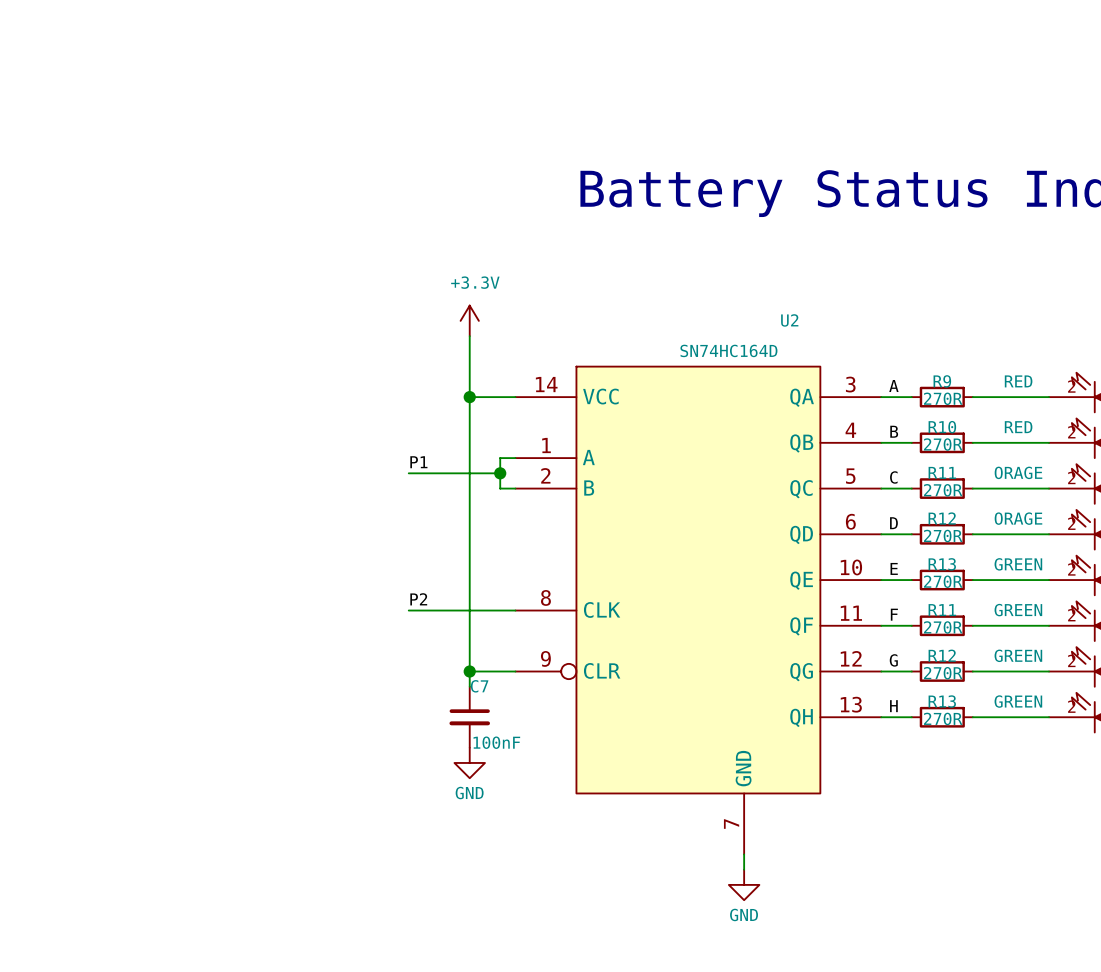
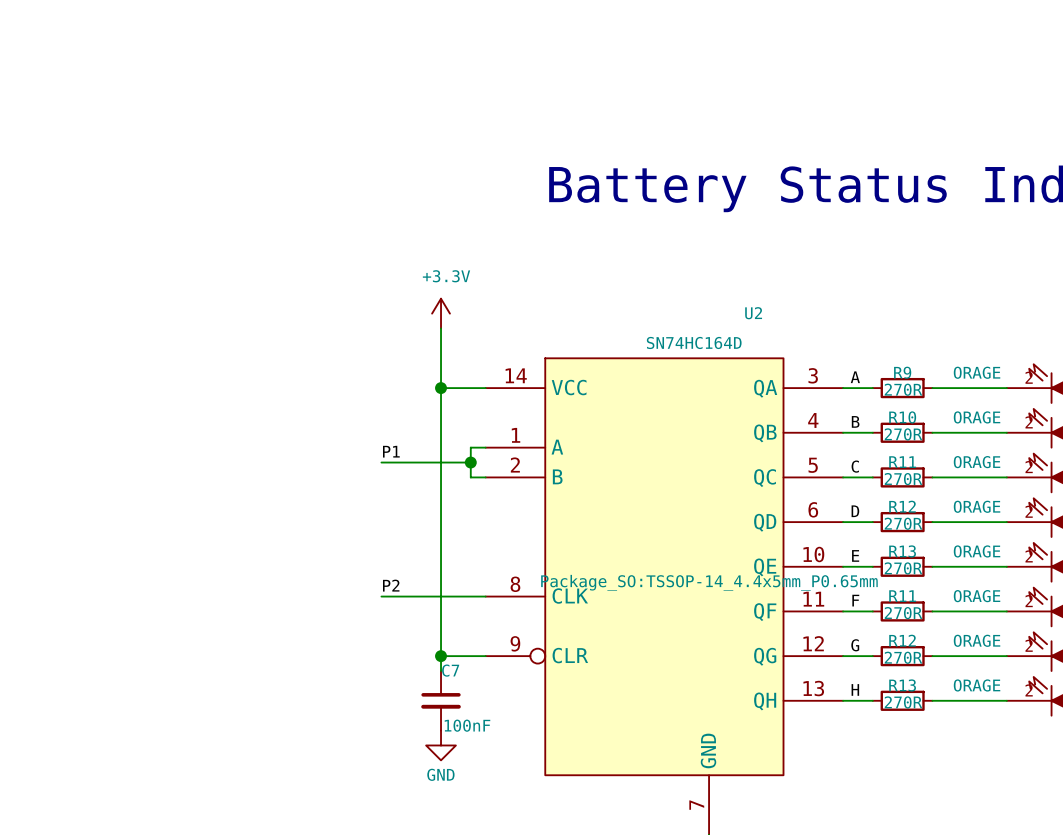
part value: RED (1018, 381) -> ORAGE (977, 372)
part value: RED (1018, 427) -> ORAGE (977, 417)
part value: GREEN (1018, 564) -> ORAGE (977, 551)
U2 text: none -> Package_SO:TSSOP-14_4.4x5mm_P0.65mm (709, 582)
part value: GREEN (1018, 610) -> ORAGE (977, 596)
part value: GREEN (1018, 655) -> ORAGE (977, 640)
part value: GREEN (1018, 701) -> ORAGE (977, 685)

